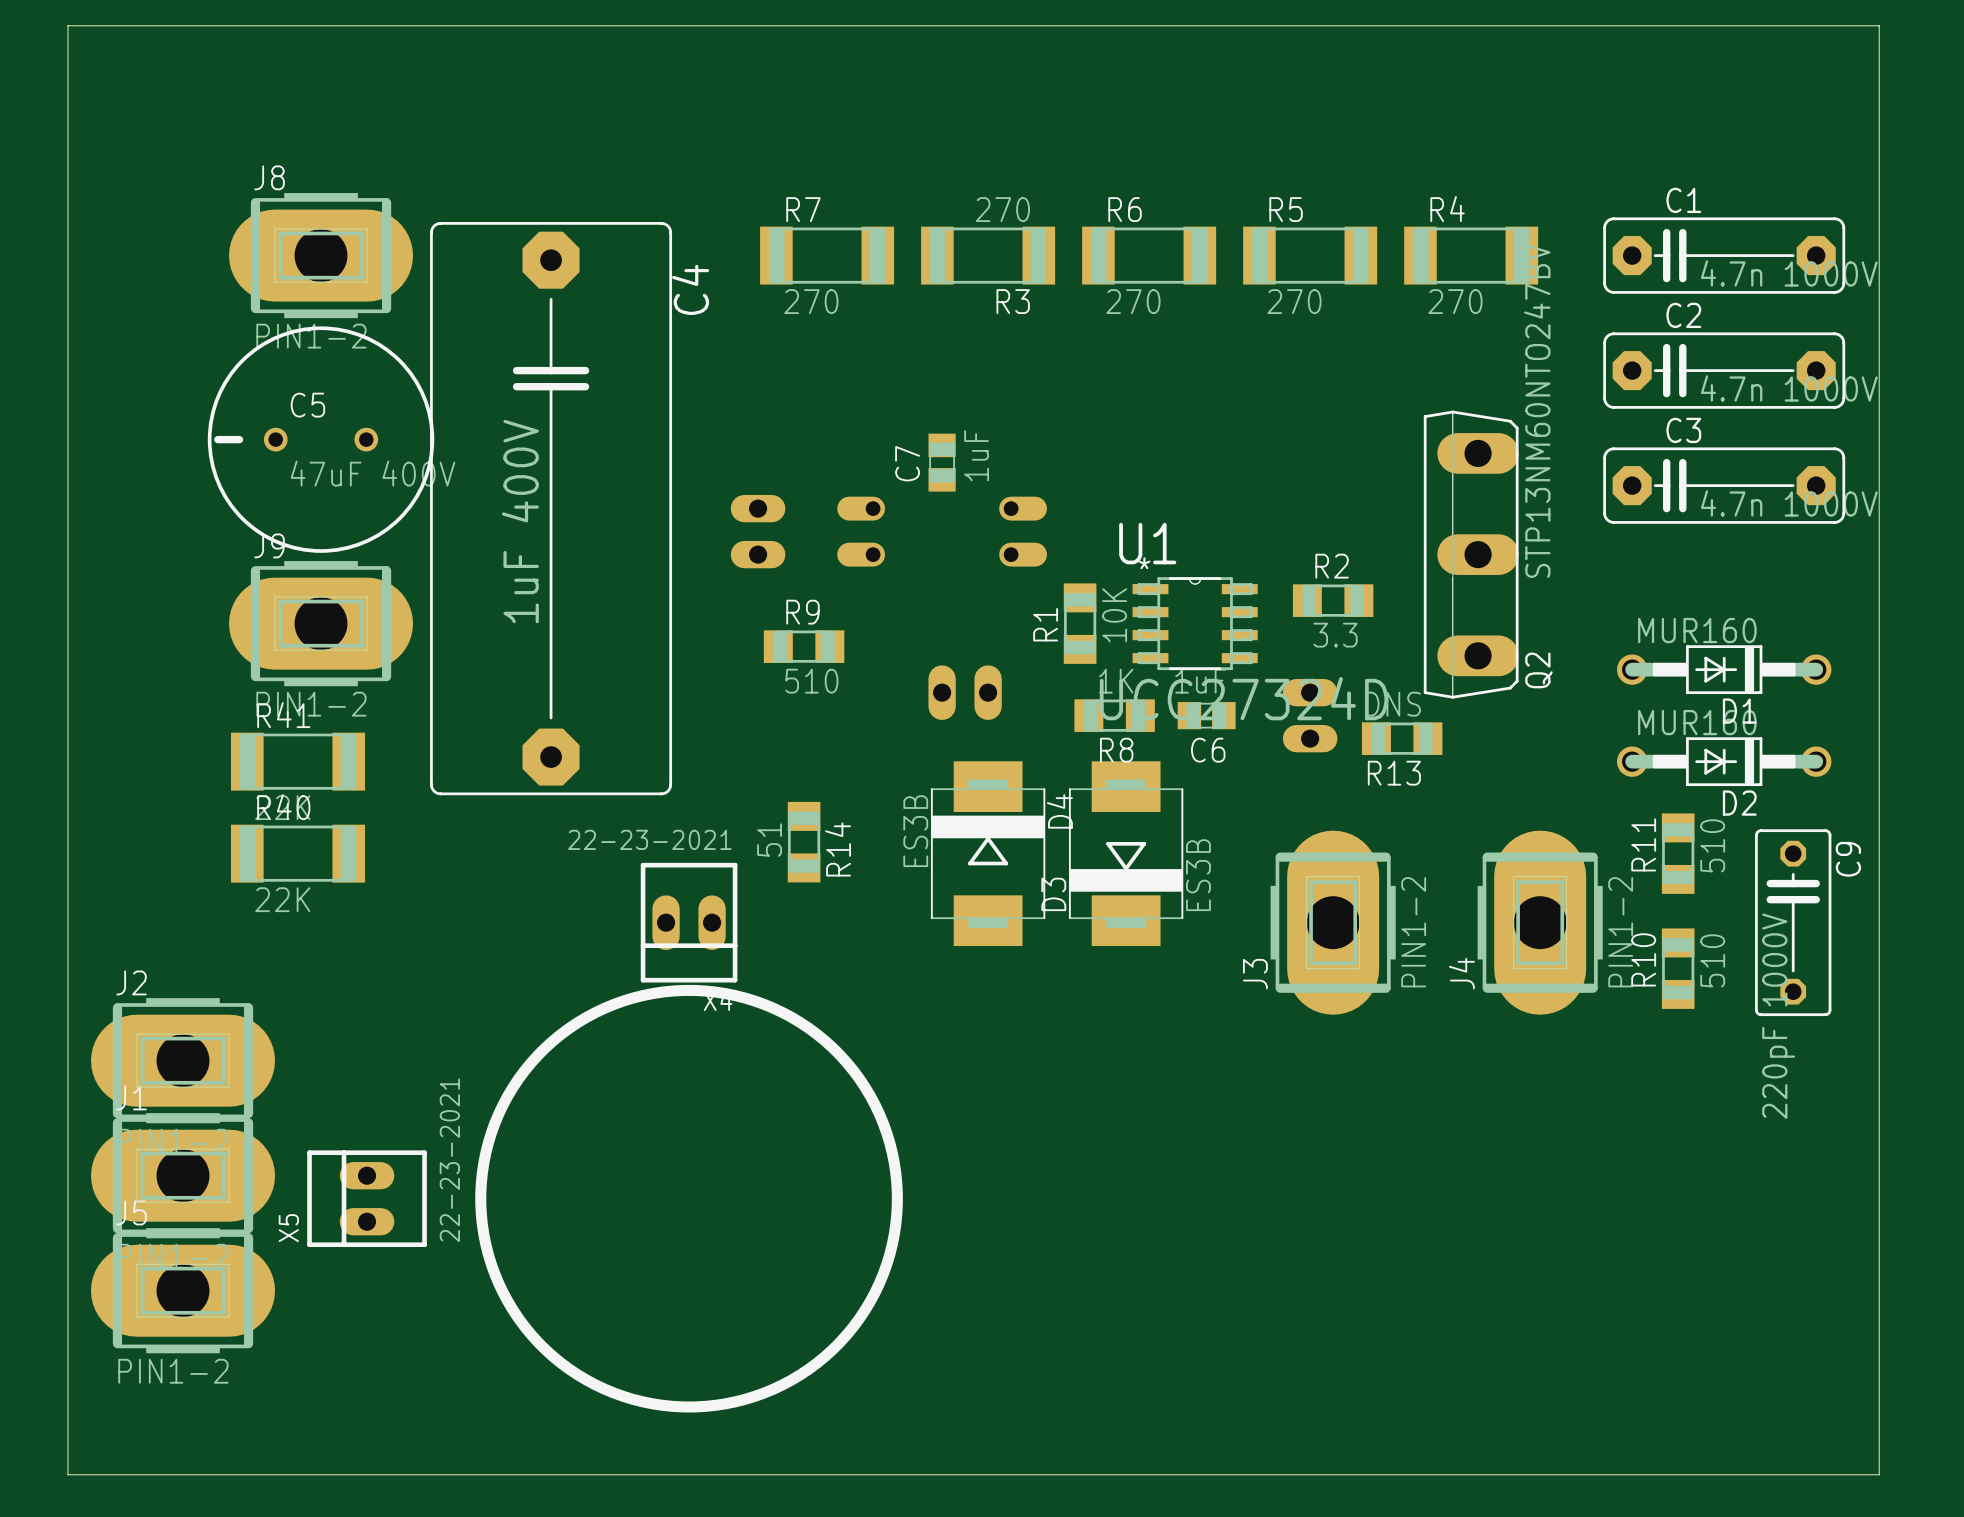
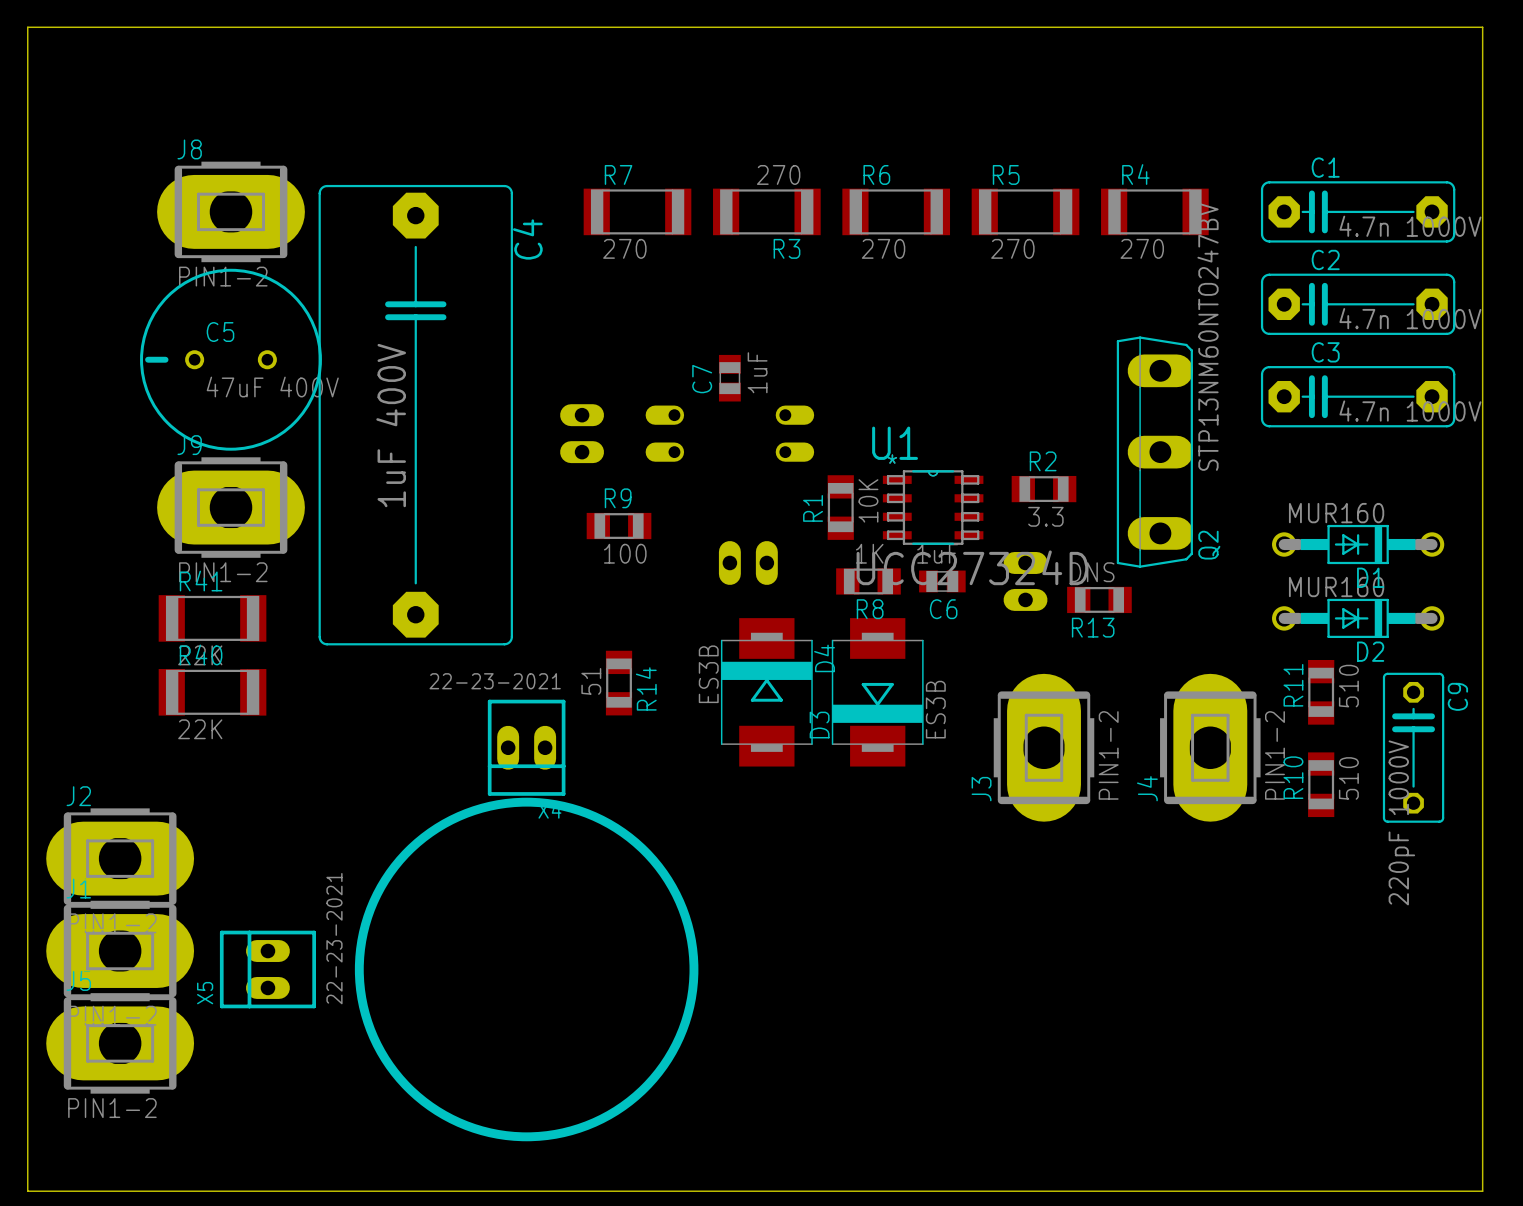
R9 value: 510 (811, 681) -> 100 (625, 553)

